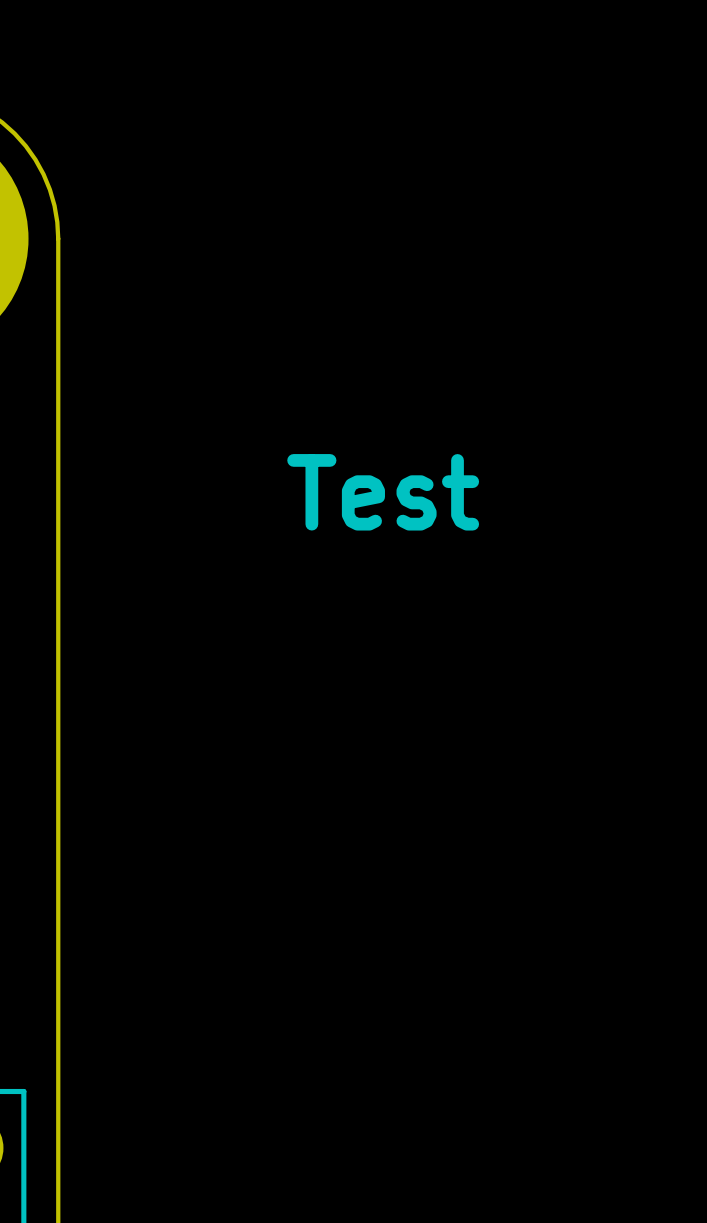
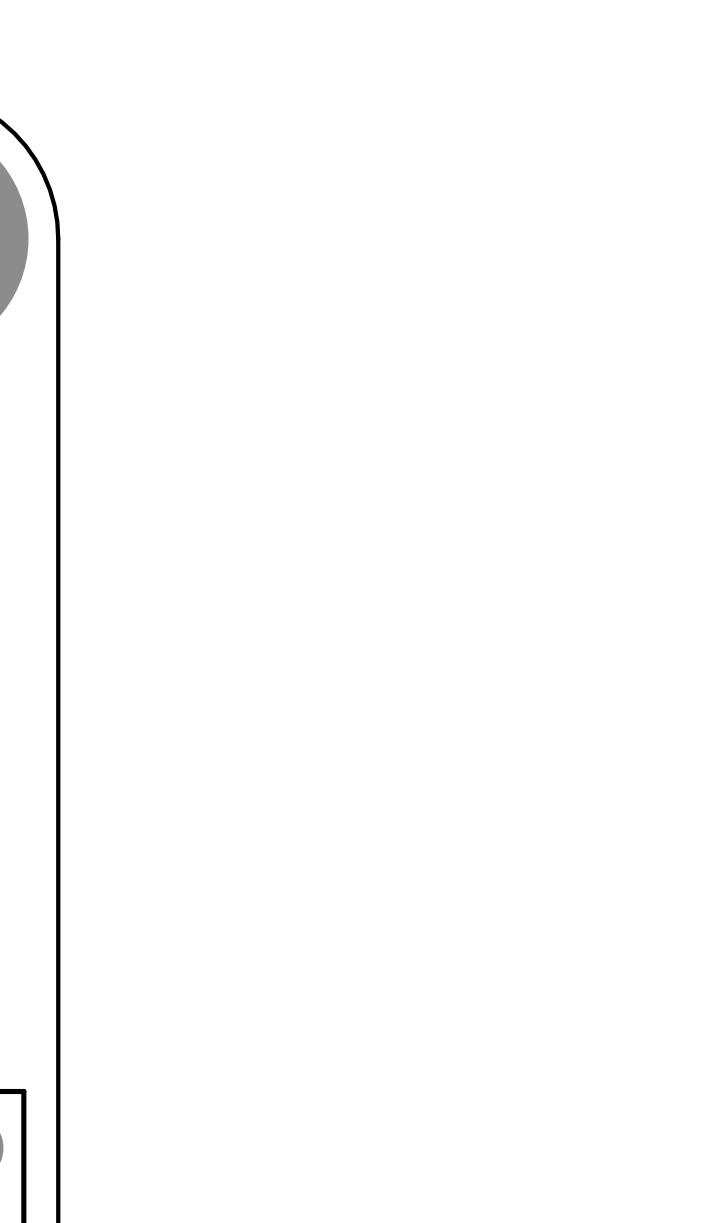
text: Test (383, 492) -> none

